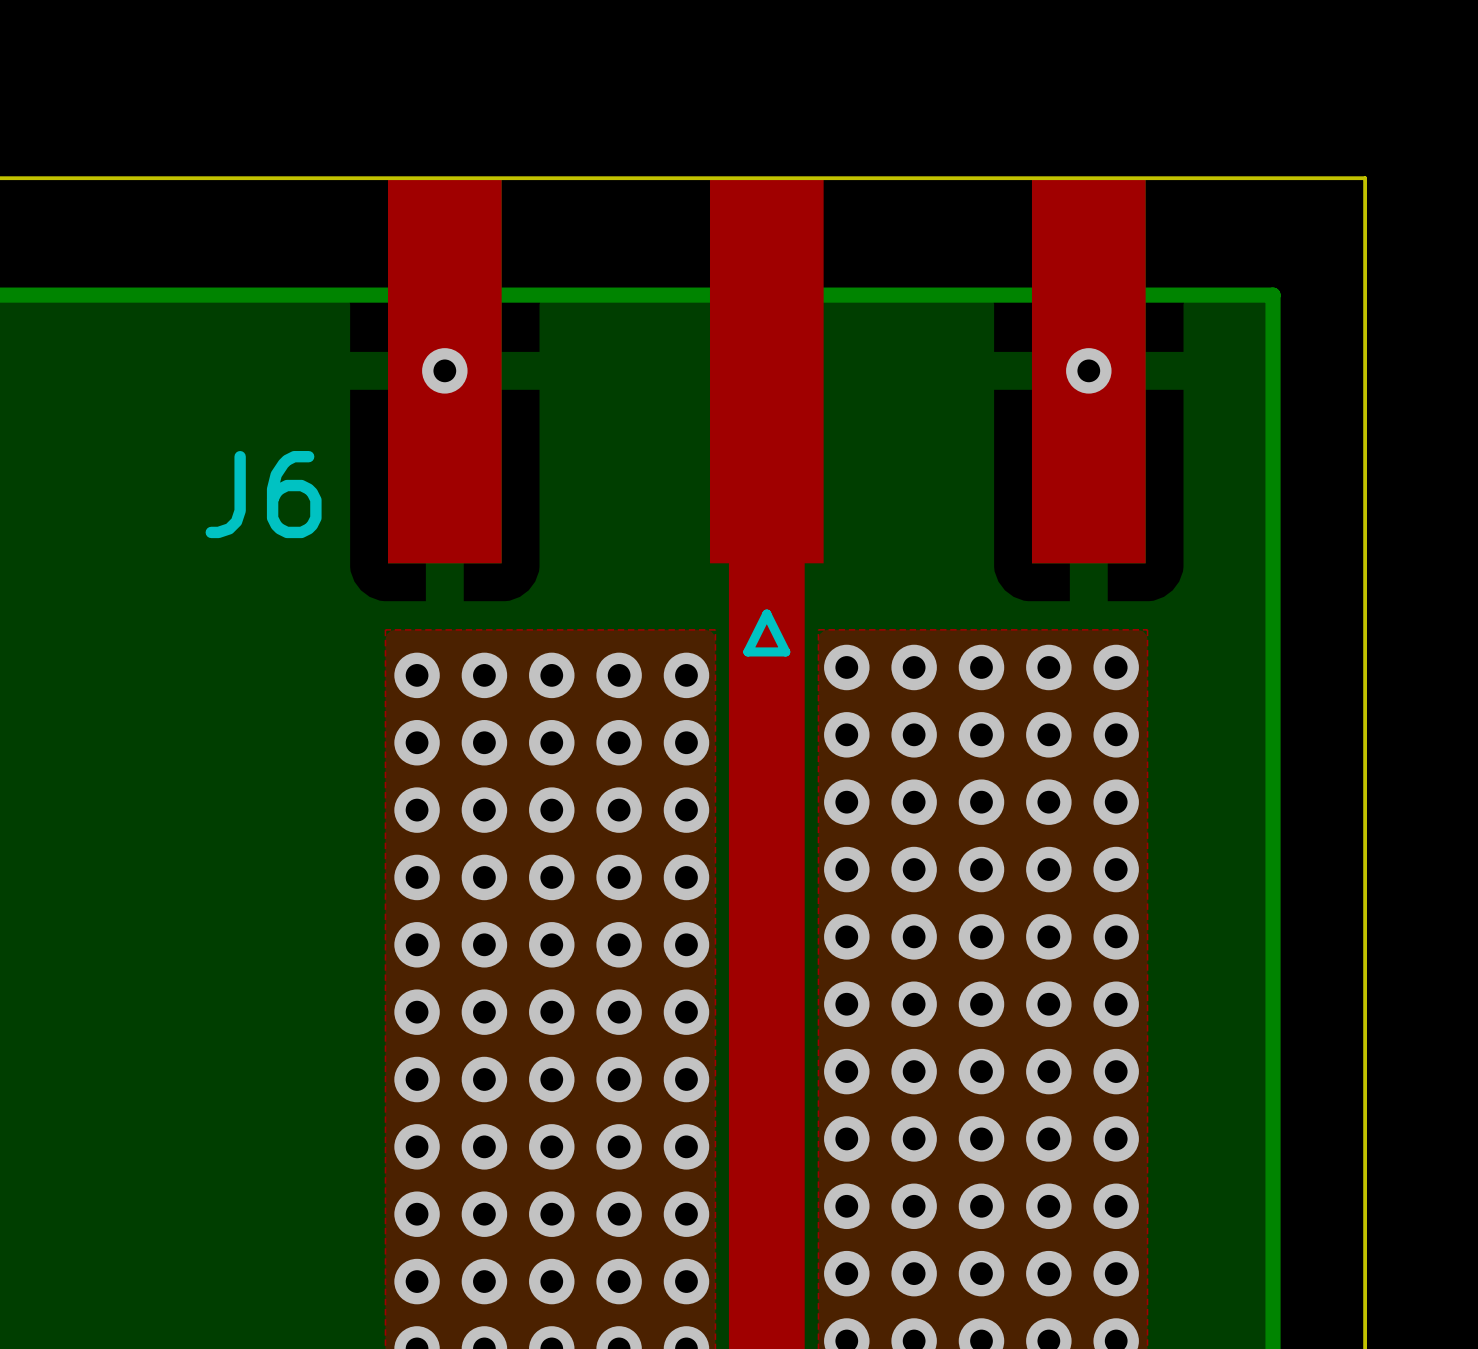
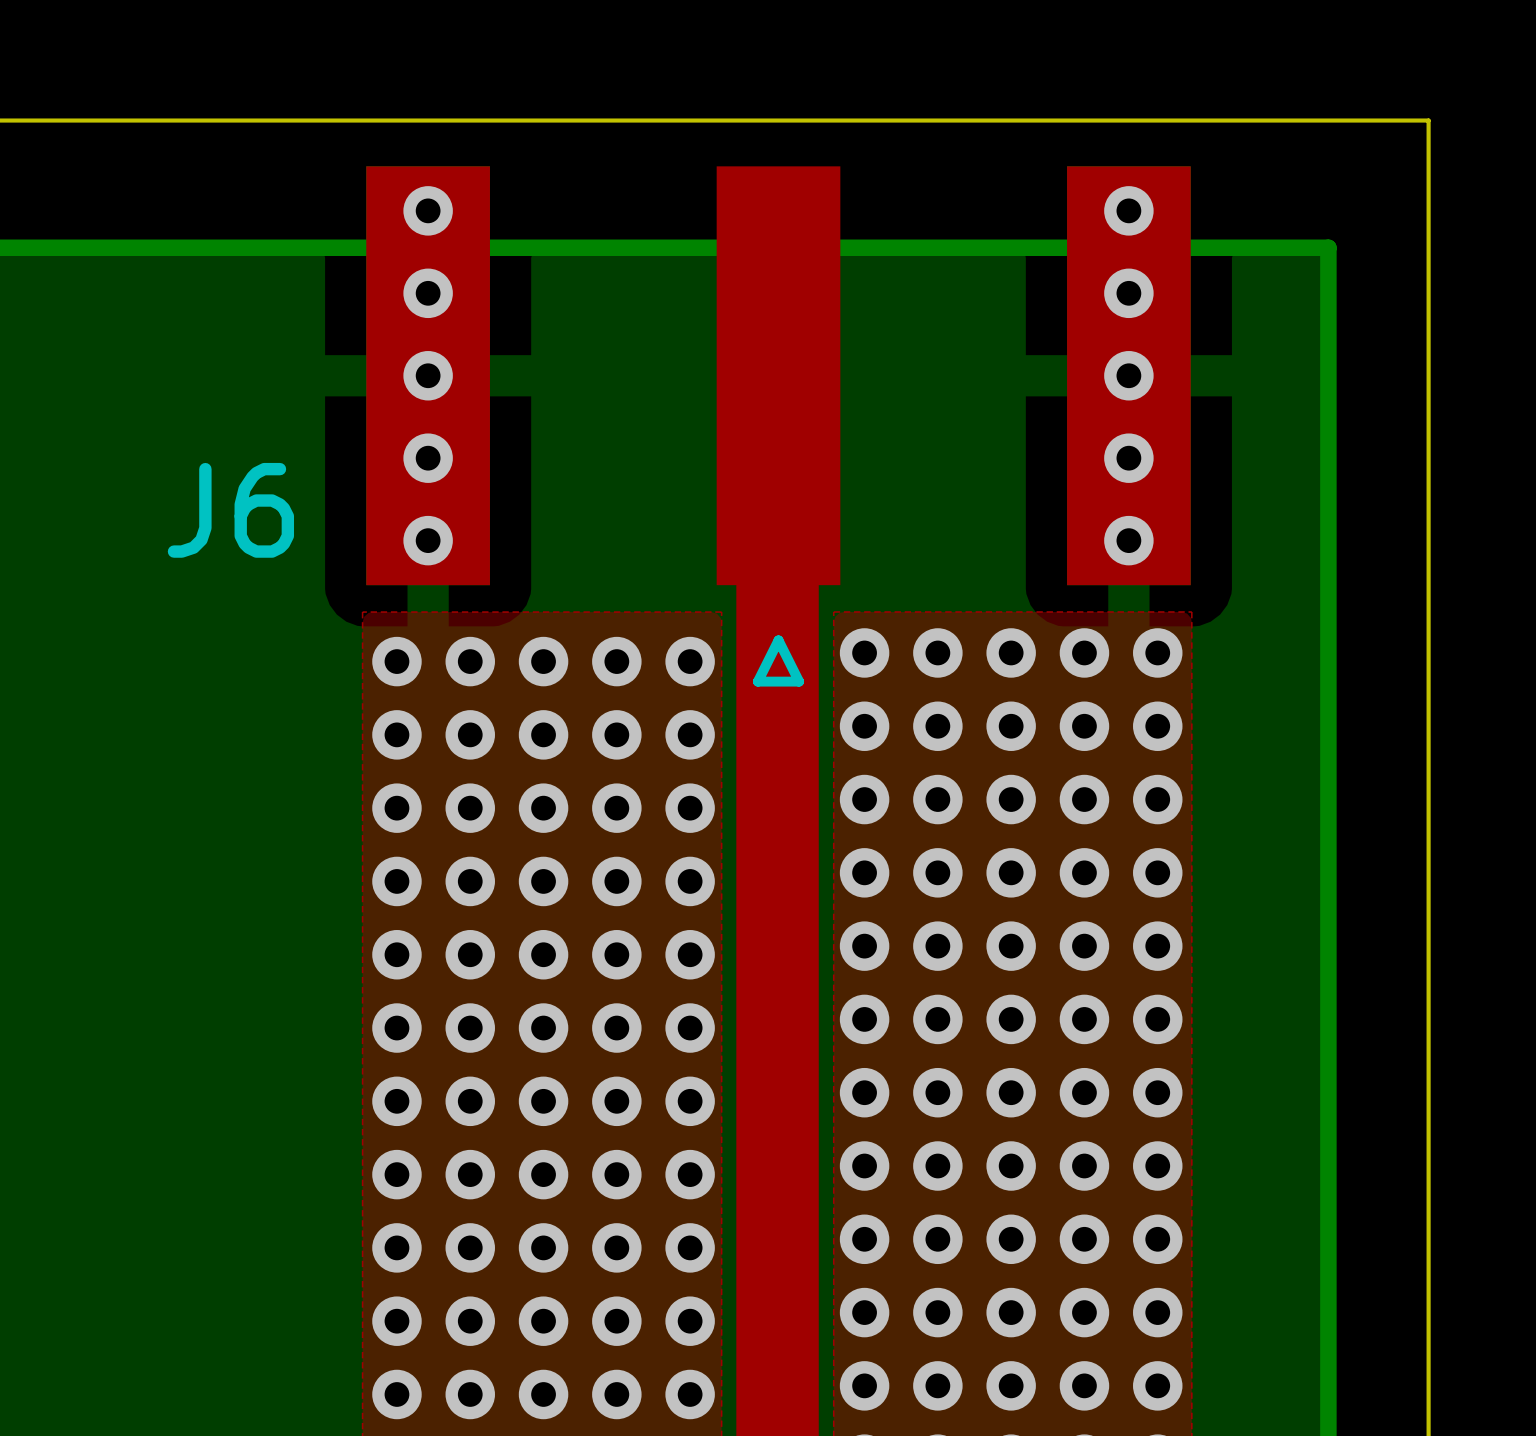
via: none -> (428, 210)
via: none -> (1128, 210)
via: none -> (428, 293)
via: none -> (1128, 293)
via: (444, 370) -> none
via: (1088, 370) -> none
via: none -> (428, 375)
via: none -> (1128, 375)
J6 position: (766, 417) -> (778, 426)
via: none -> (428, 458)
via: none -> (1128, 458)
via: none -> (428, 540)
via: none -> (1128, 540)

